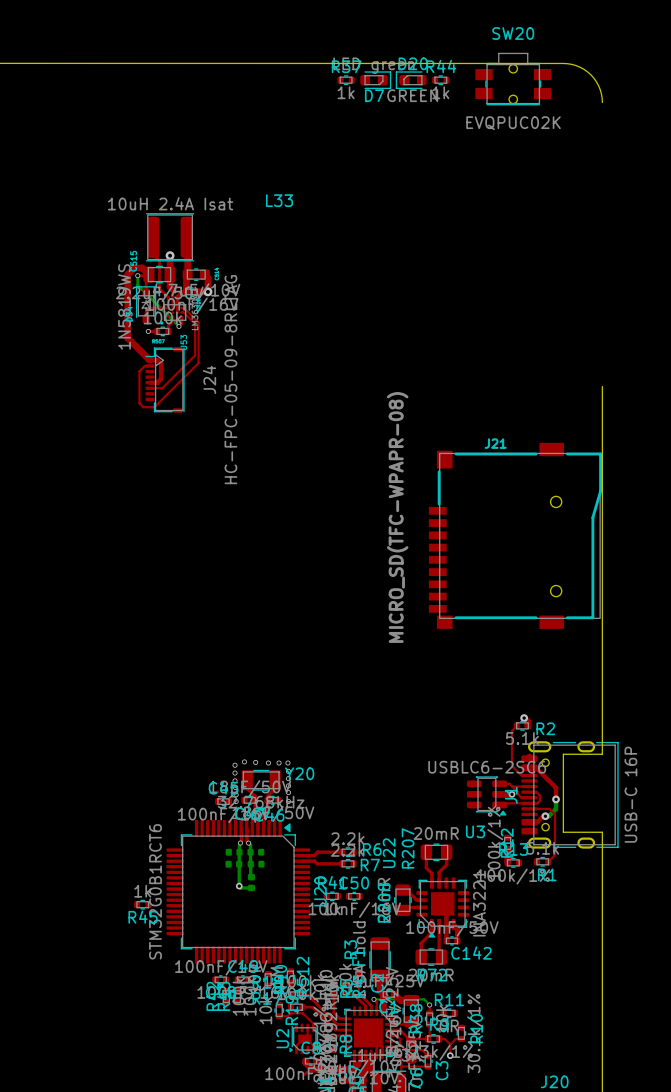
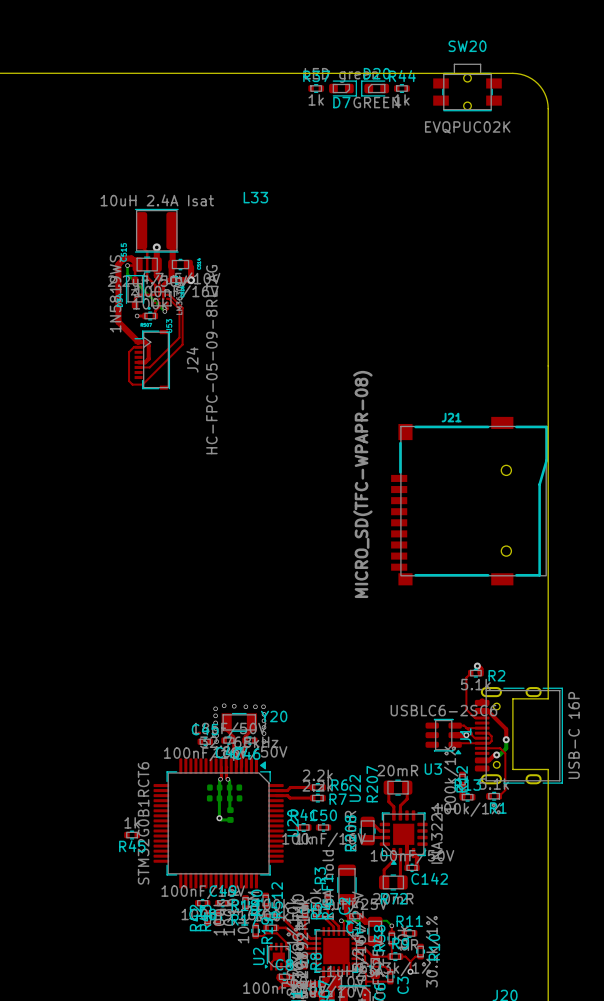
board edge: none -> (548, 108) (548, 365)

